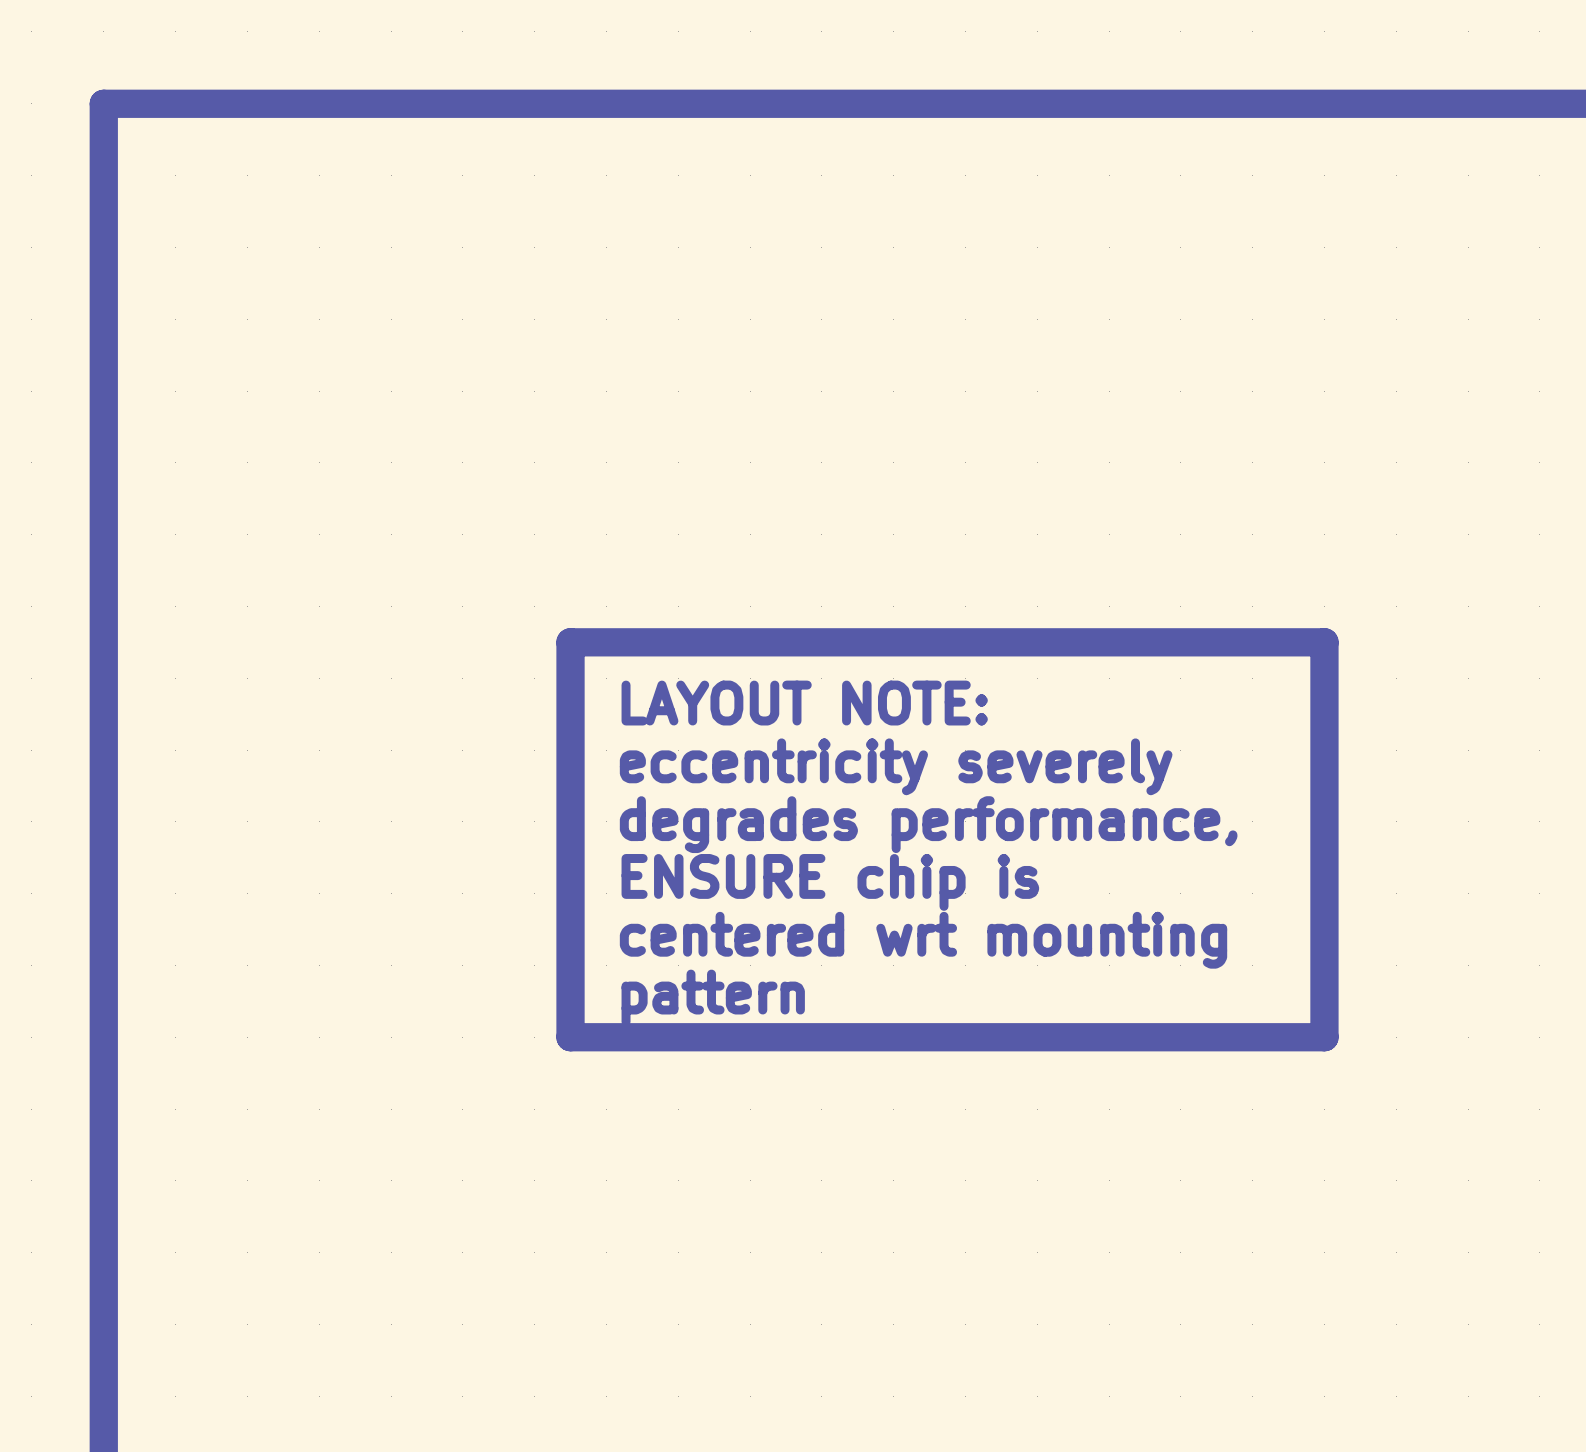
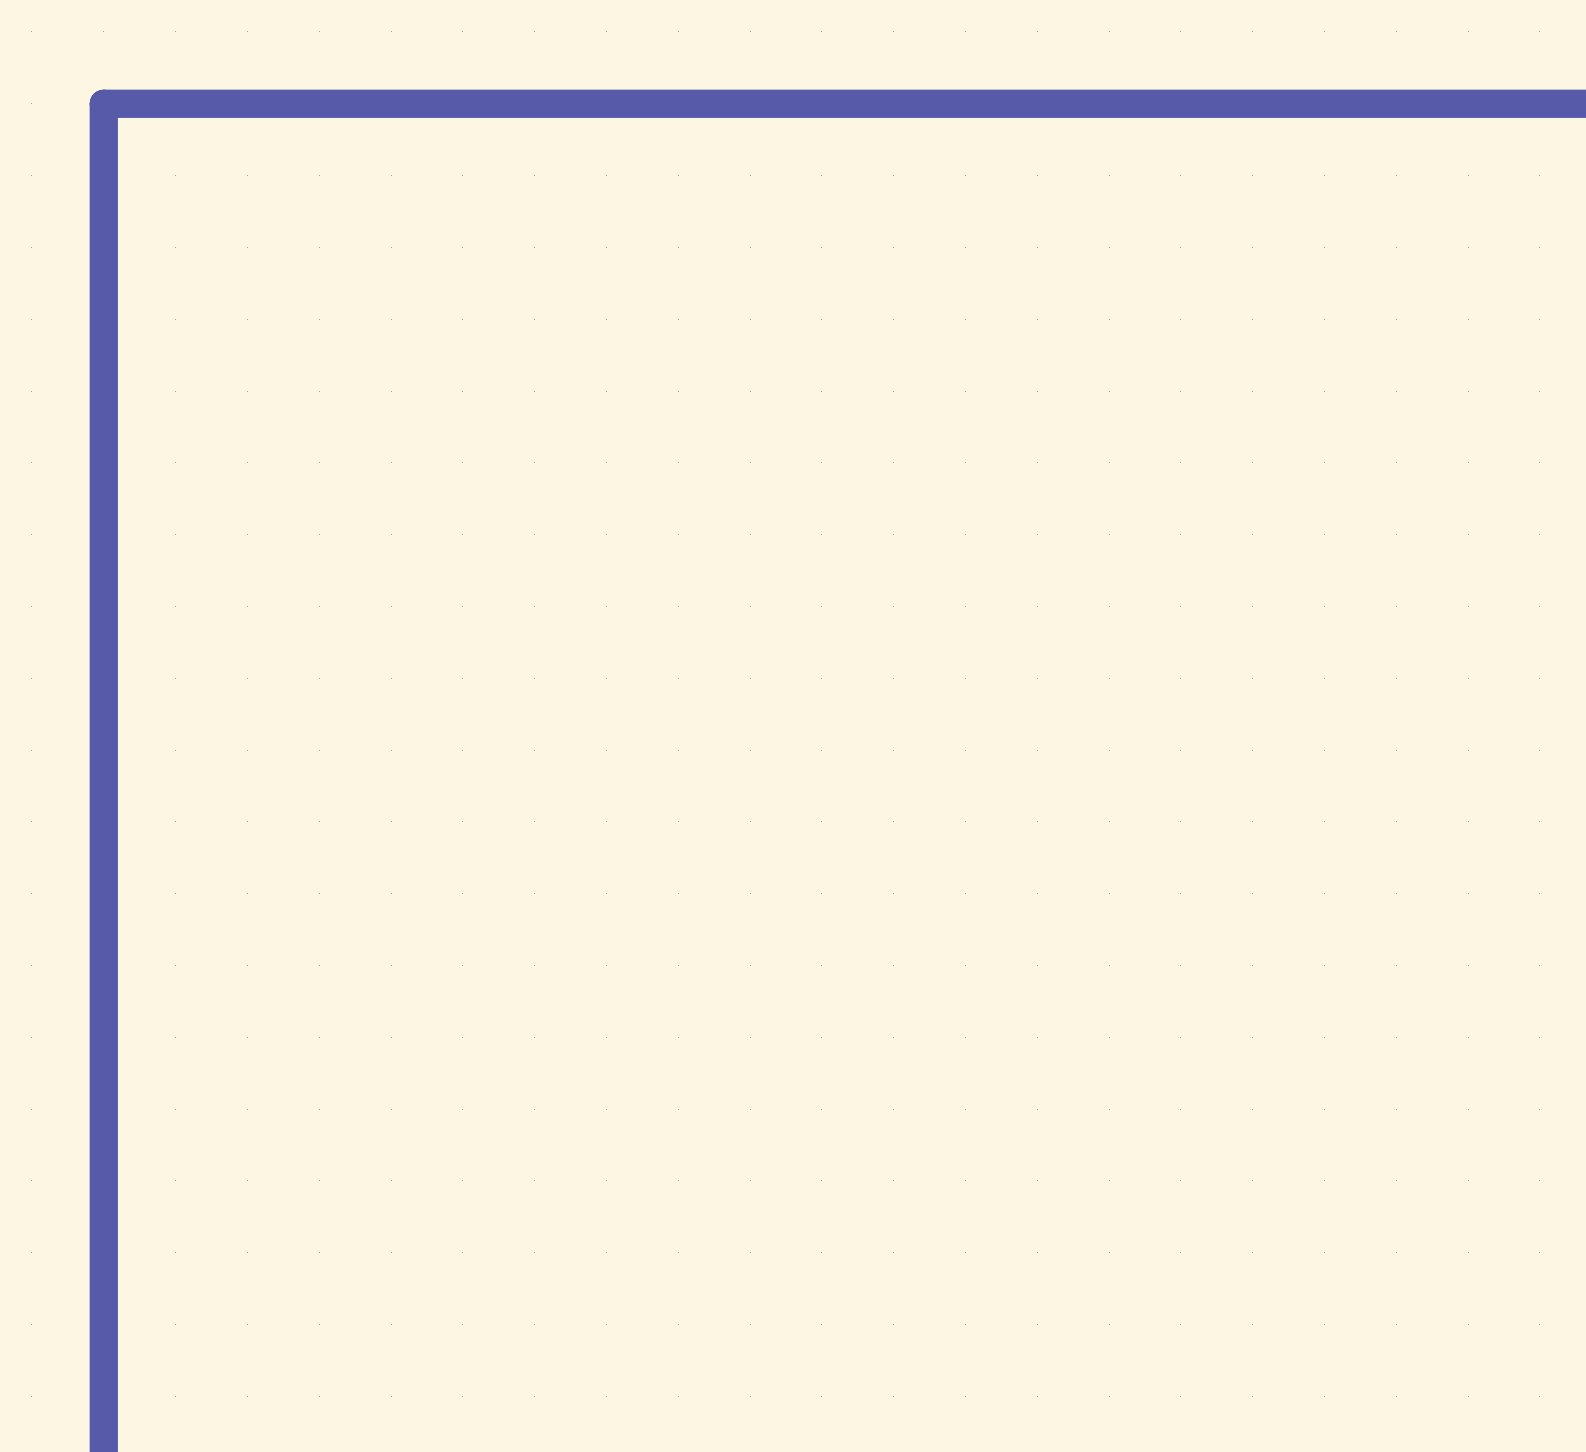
line: (570, 642) (1324, 642) (1324, 1037) (570, 1037) (570, 642) -> none
text: LAYOUT NOTE: (804, 703) -> none
text: eccentricity severely (896, 766) -> none
text: degrades performance, (928, 824) -> none
text: ENSURE chip is (830, 882) -> none
text: centered wrt mounting (923, 940) -> none
text: pattern (713, 998) -> none

